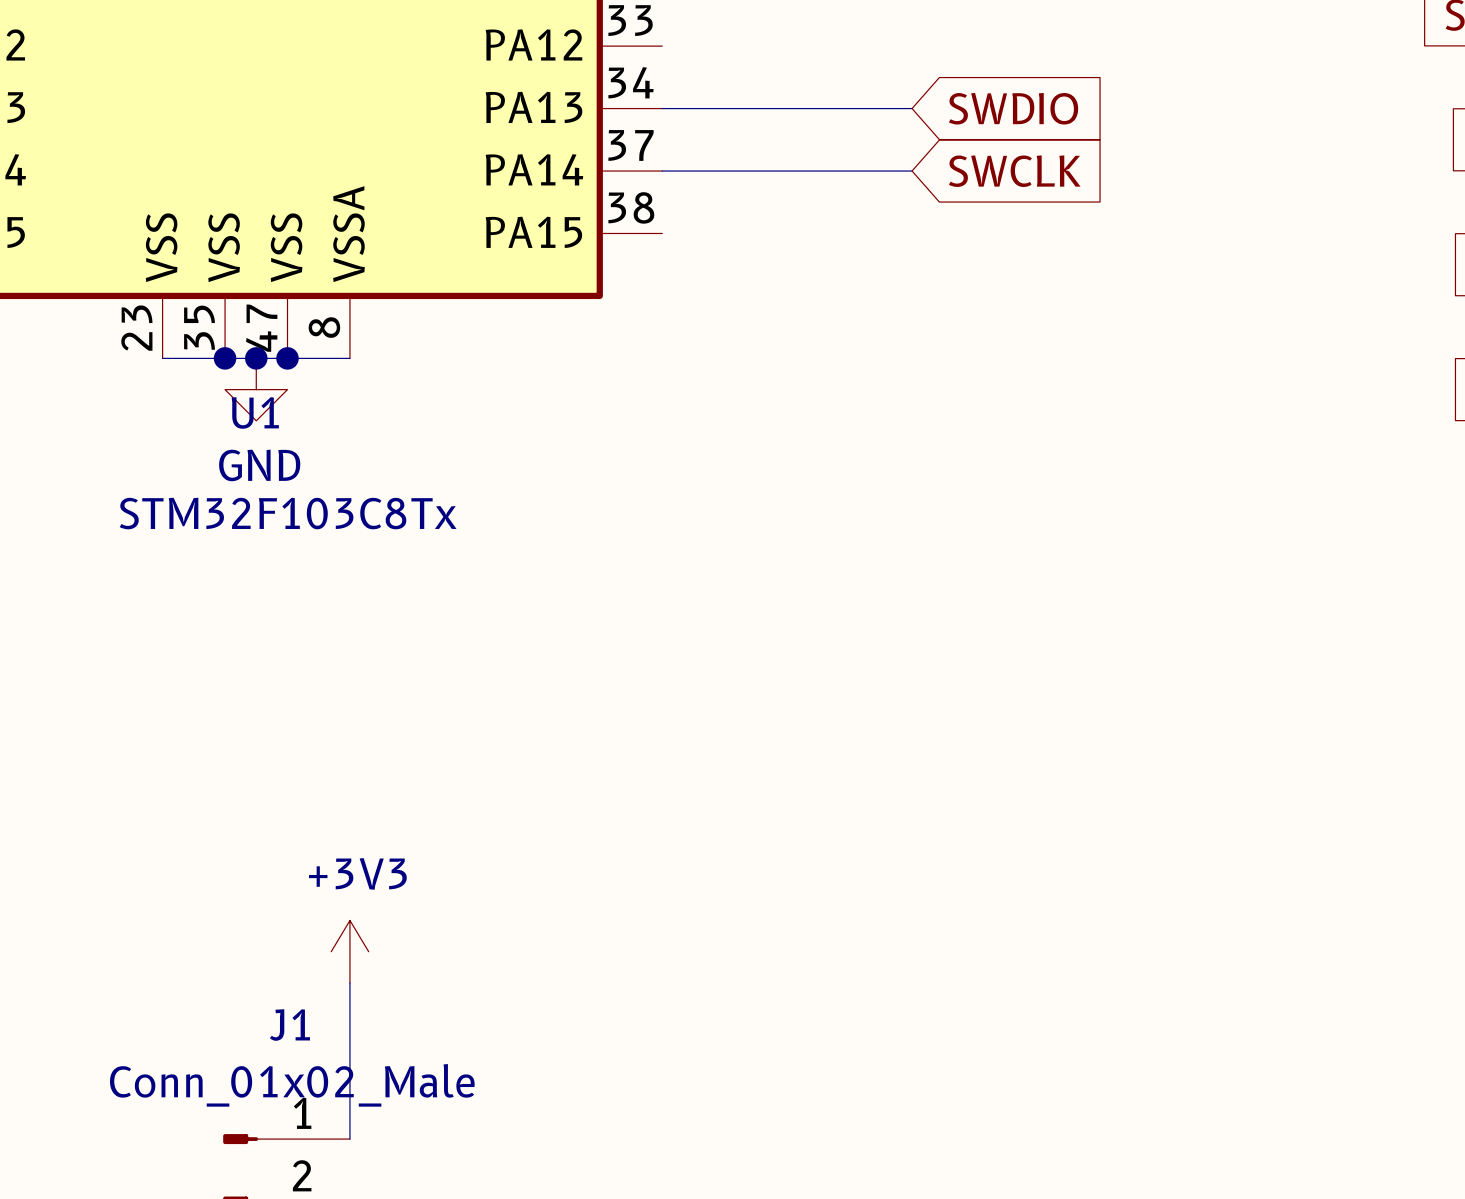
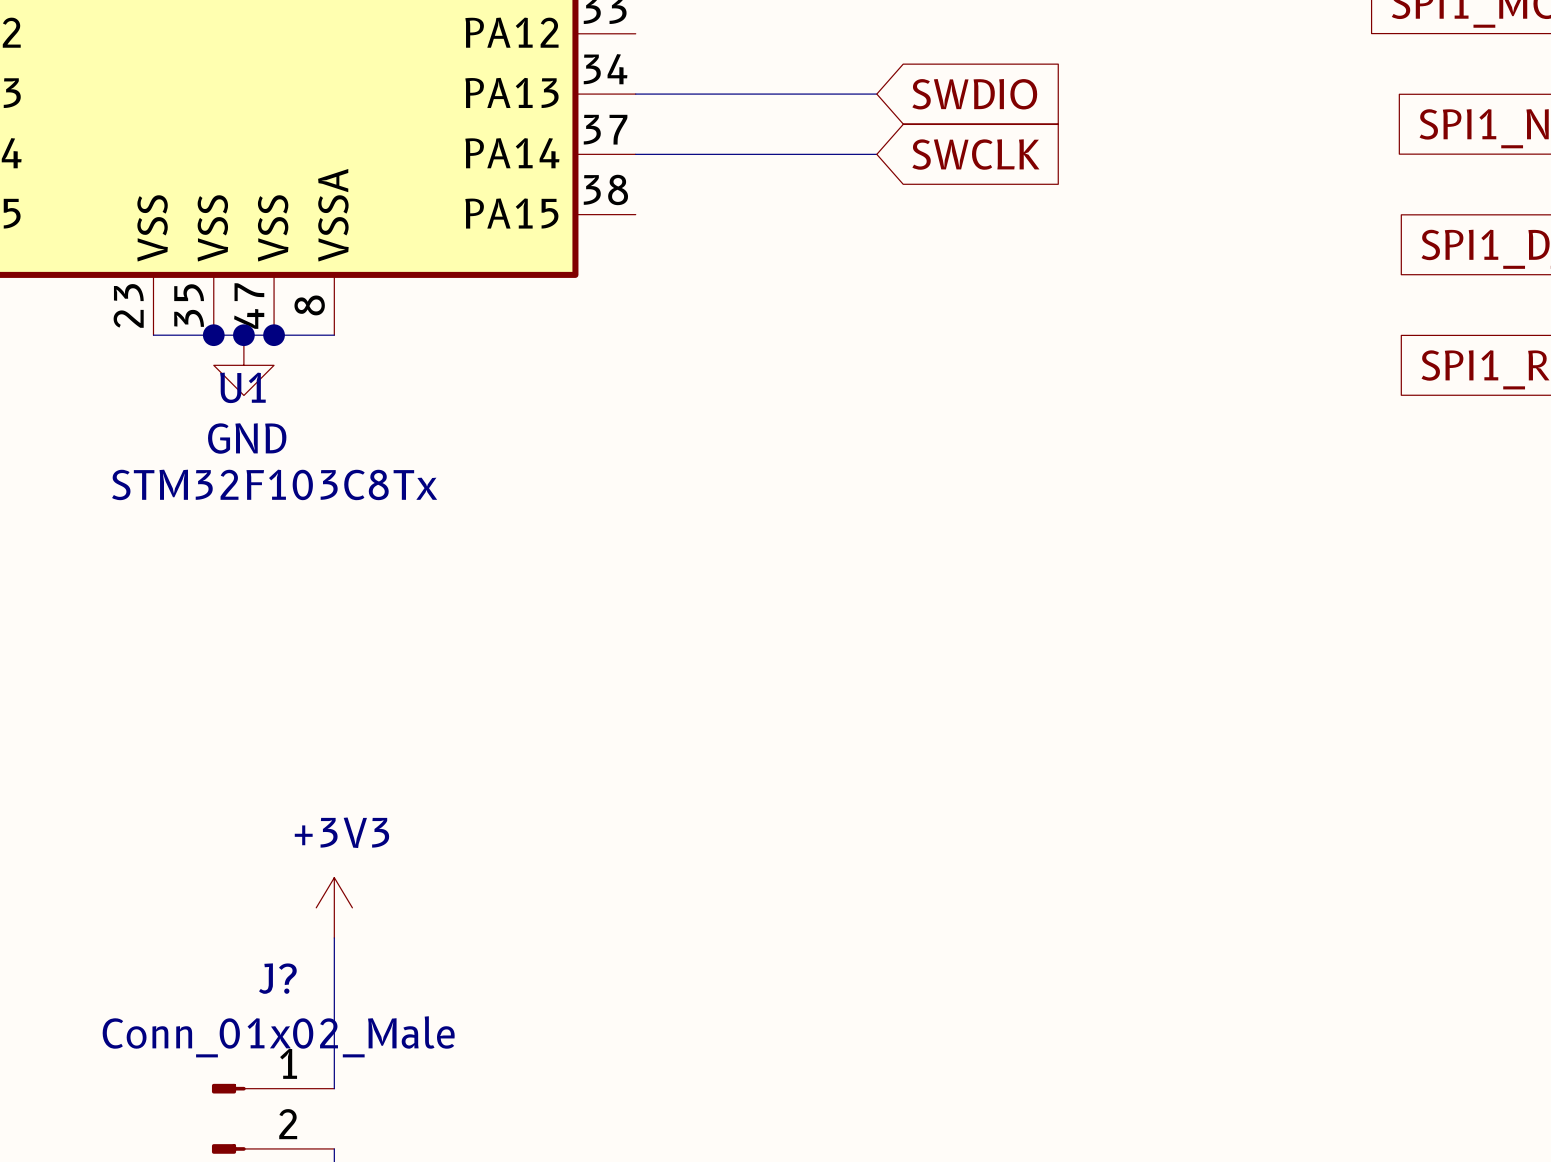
J1 name: J1 (289, 1025) -> J? (277, 978)

